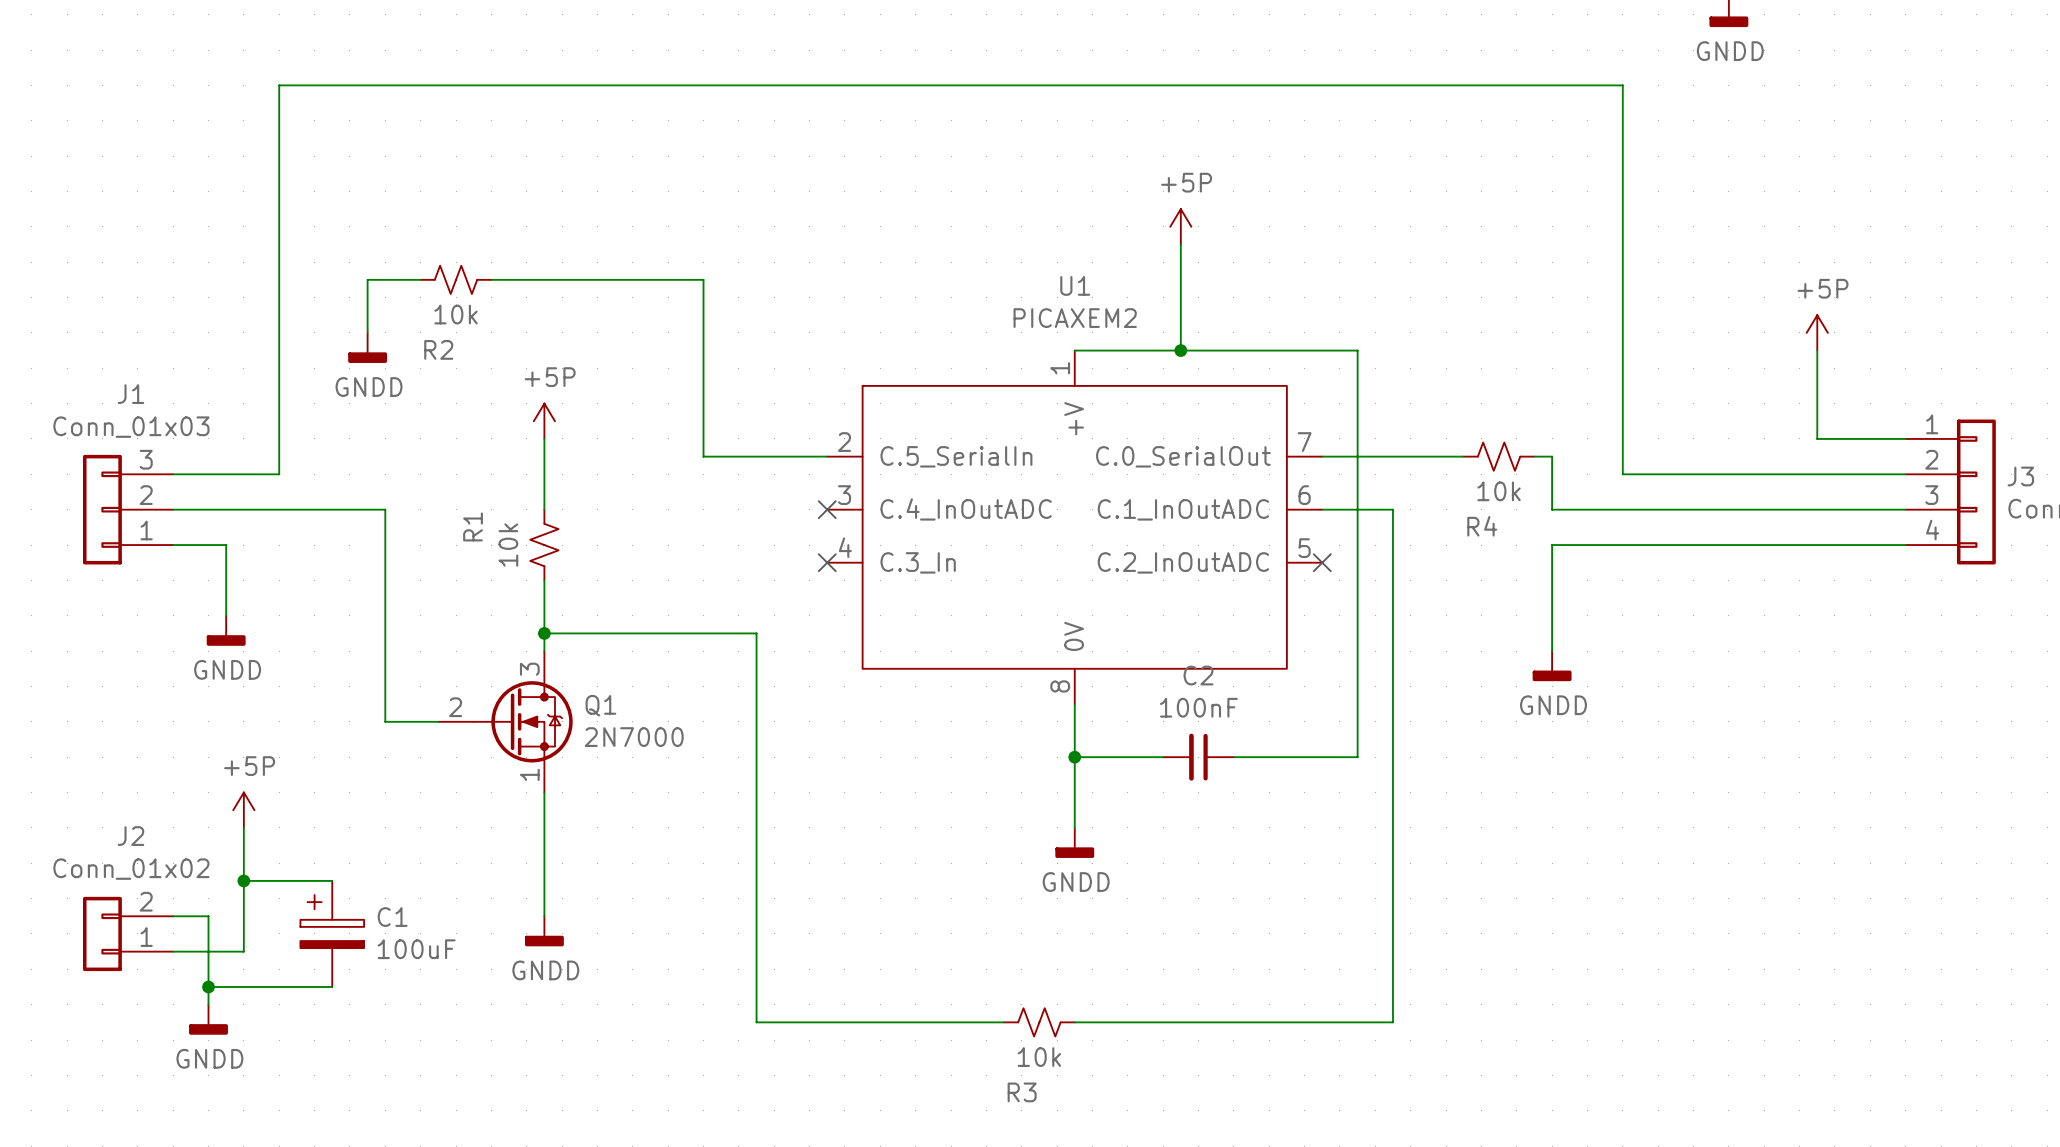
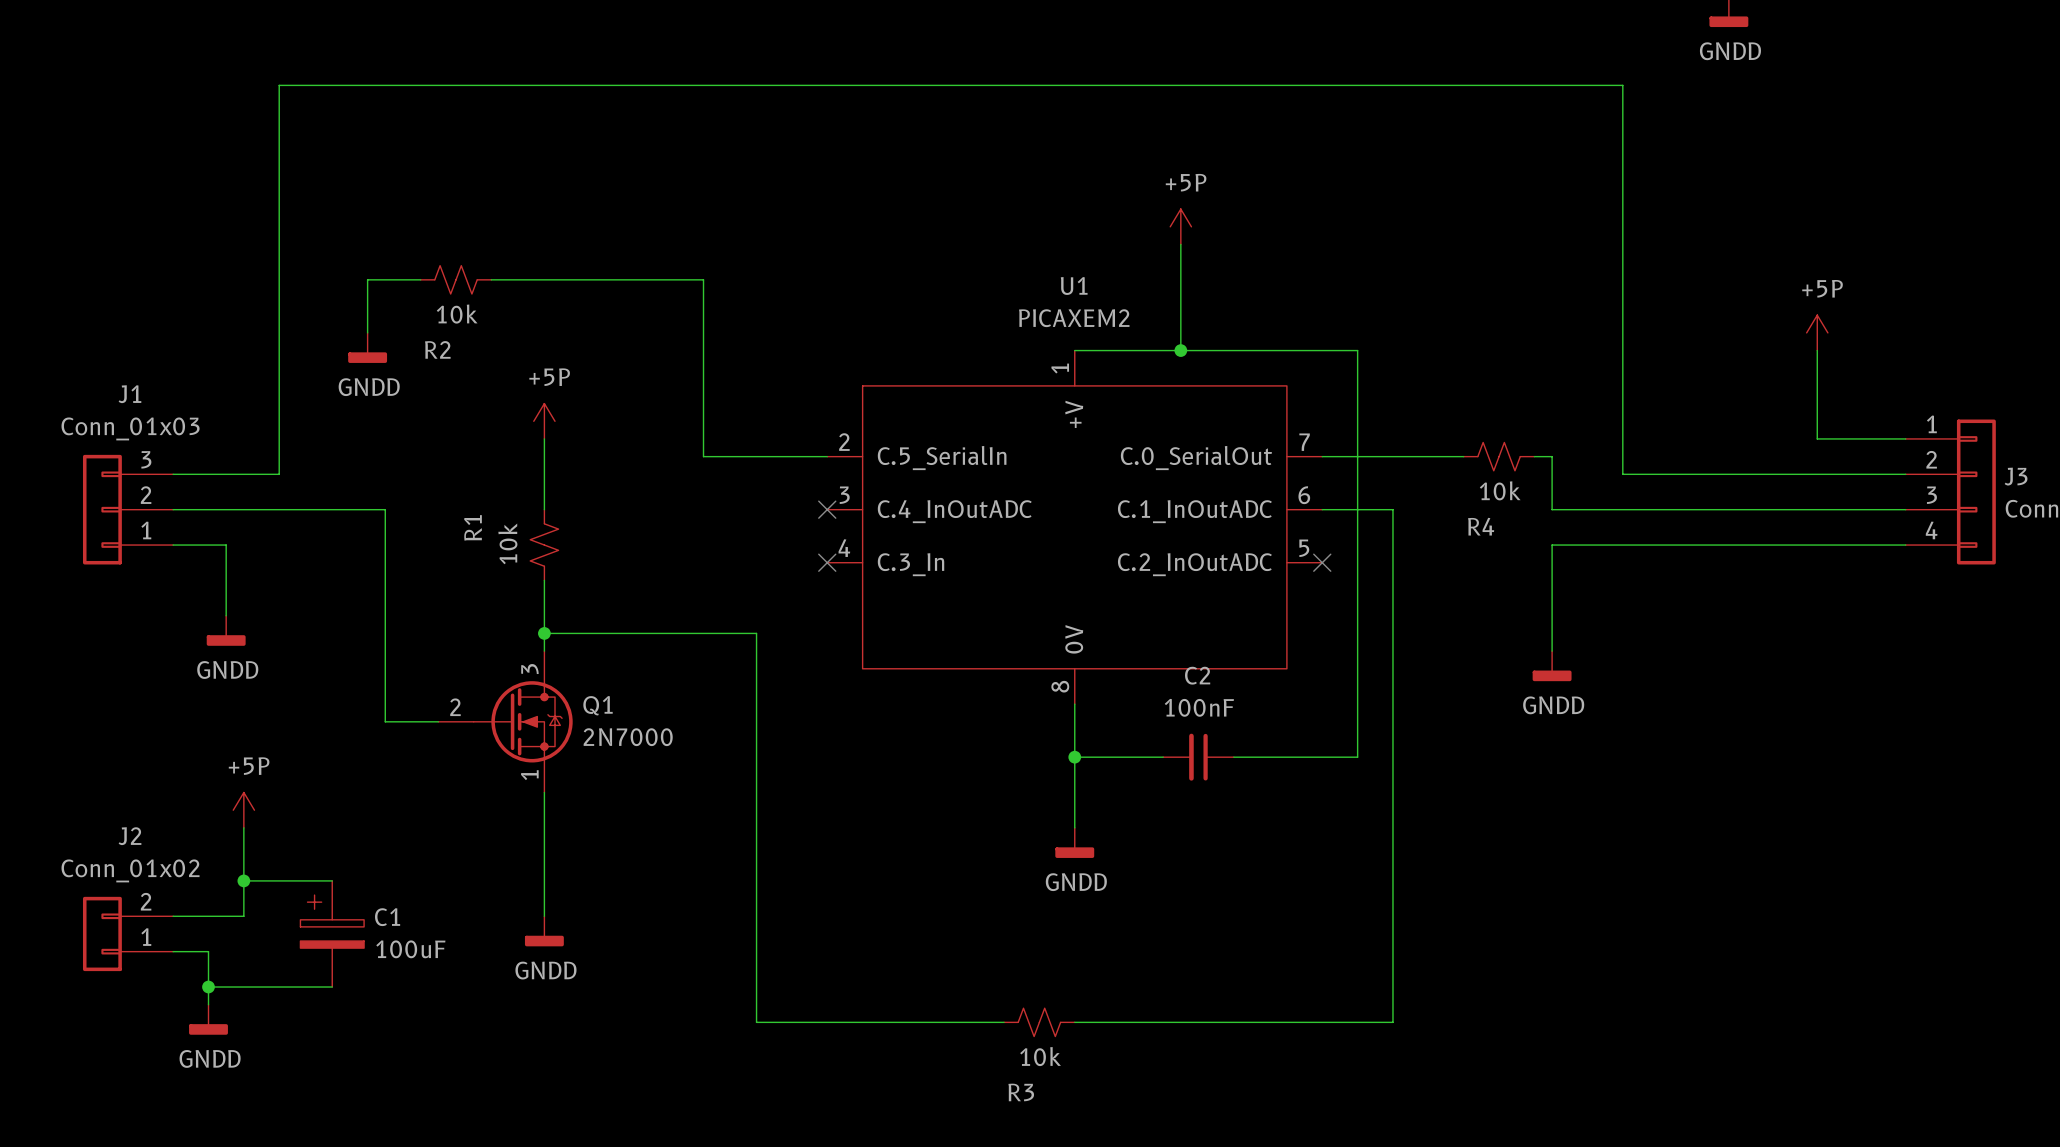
wire: (208, 916) (208, 951) (243, 951) (243, 916) -> (208, 916) (243, 916)

